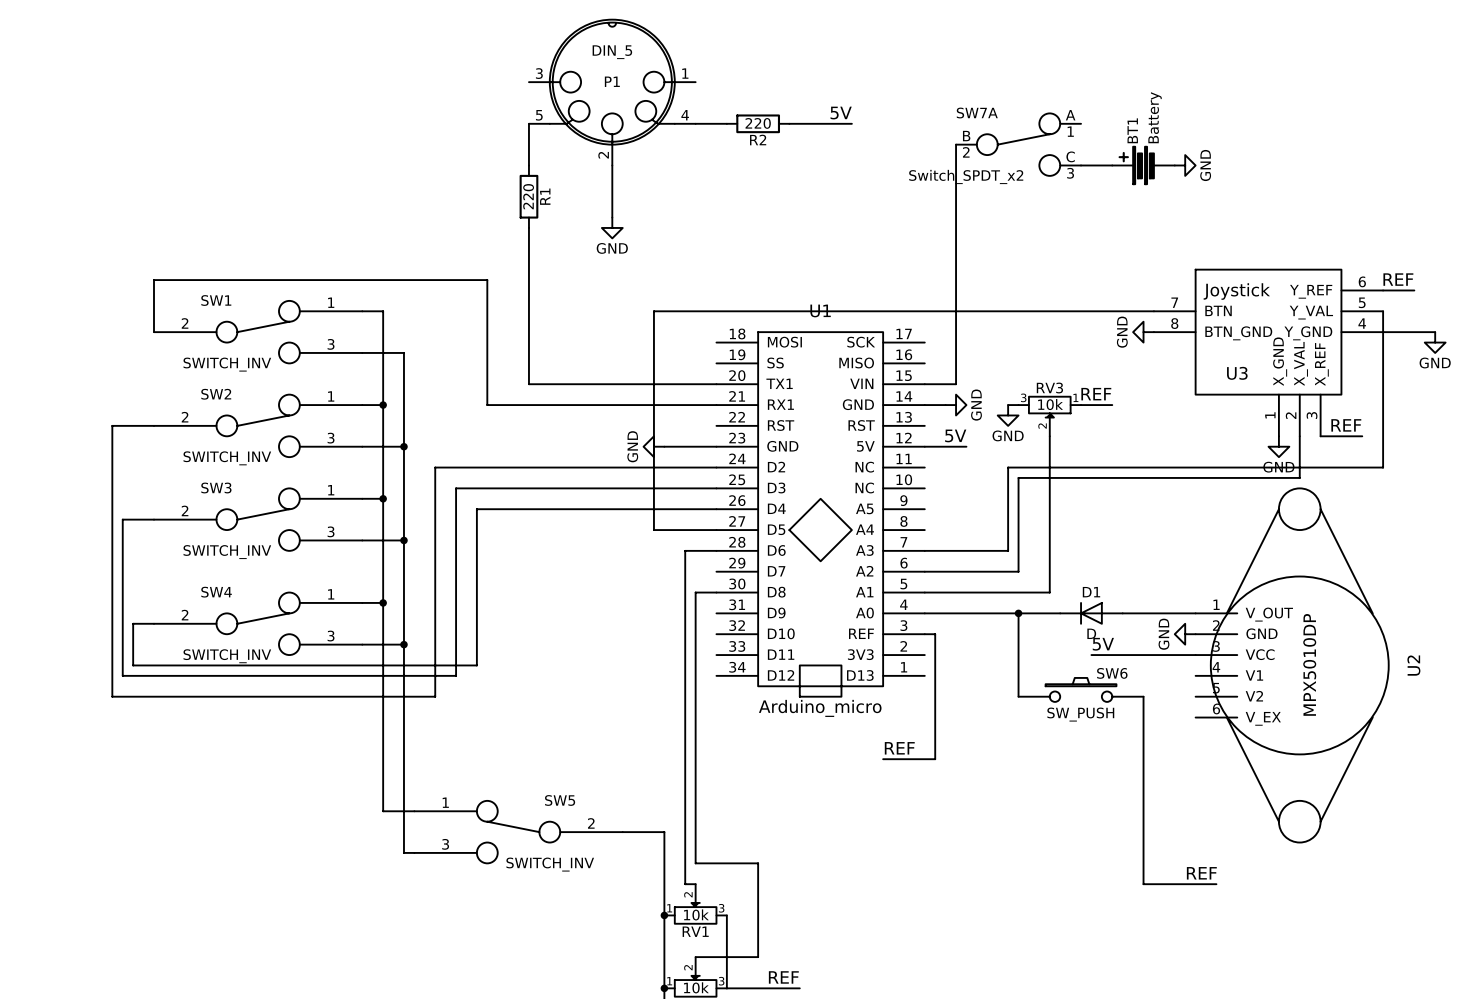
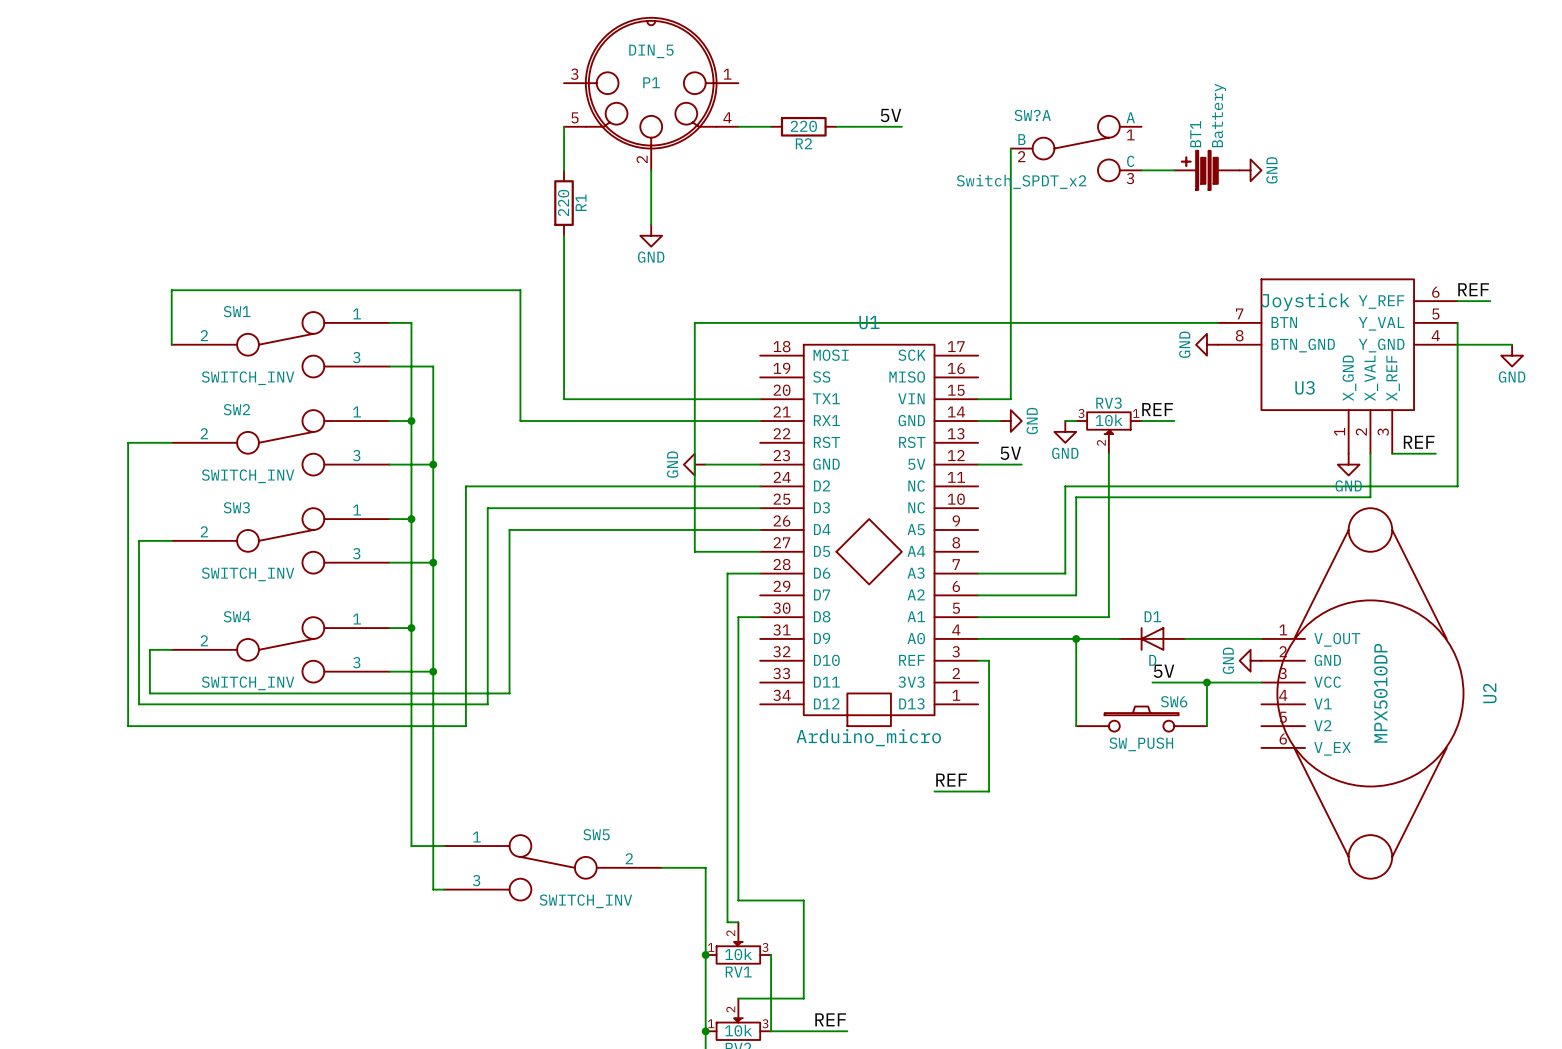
SW7A name: SW7A (977, 113) -> SW?A (1032, 115)
junction: none -> (1206, 682)
wire: (1143, 696) (1143, 884) (1216, 884) -> (1206, 726) (1206, 682)
label: REF (1201, 873) -> none

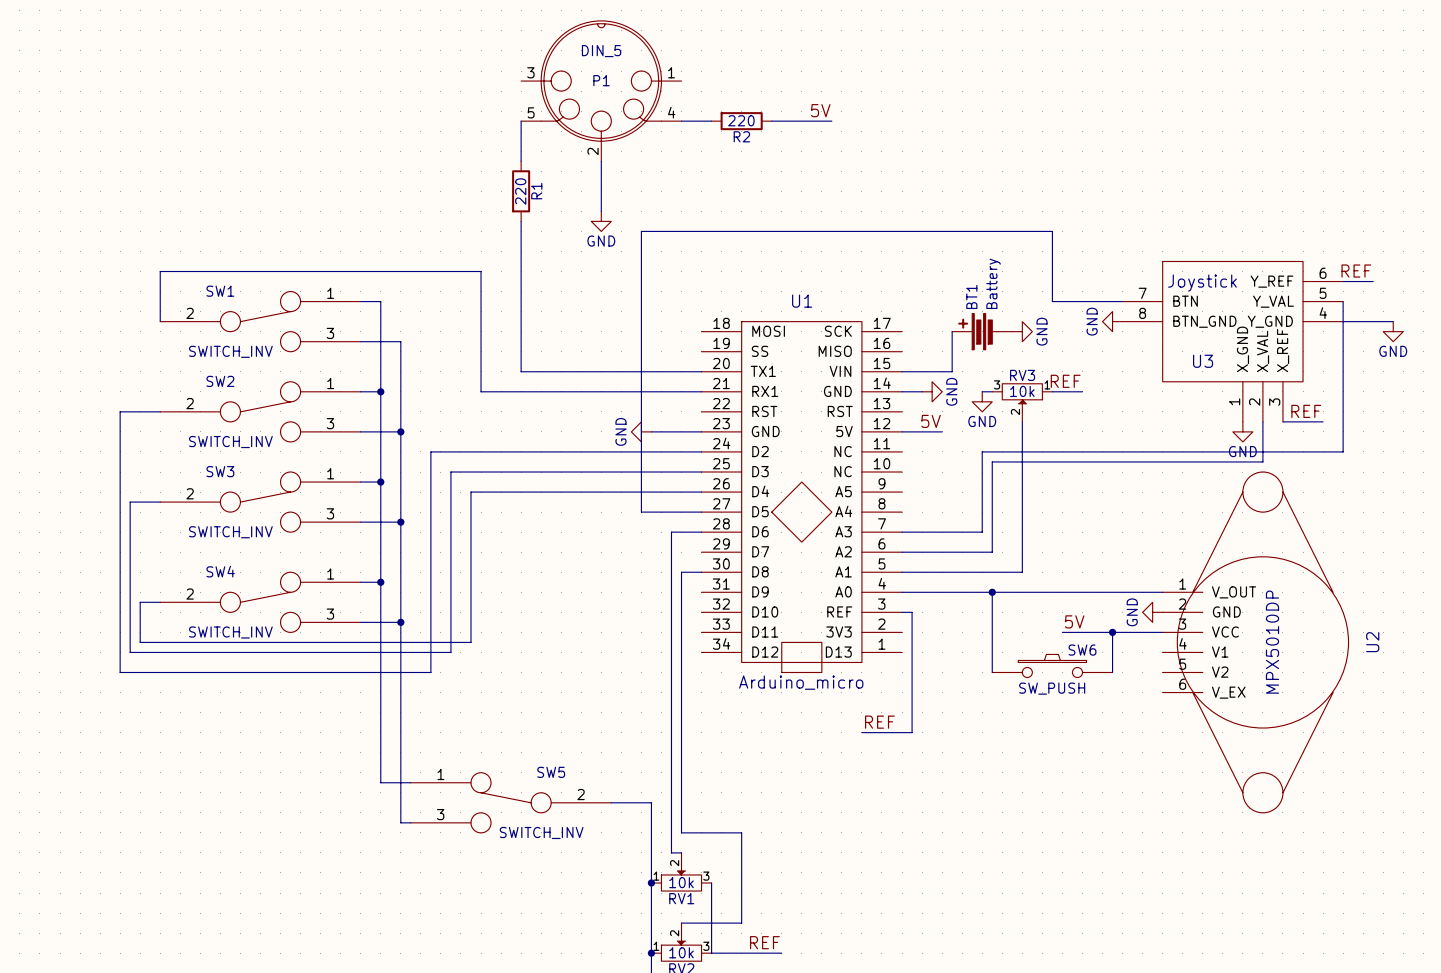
wire: (1010, 148) (1010, 399) -> (952, 331) (952, 371) (932, 371)
SW?A: Switch_SPDT_x2 (1076, 148) -> none
wire: (1141, 170) (1174, 170) -> none
BT1 position: (1206, 170) -> (982, 331)
power symbol: GND (1250, 170) -> none
wire: (694, 322) (1141, 322) -> (641, 301) (641, 231) (1052, 231) (1052, 301)
power symbol: none -> GND (1022, 331)
D1: D (1152, 638) -> none

